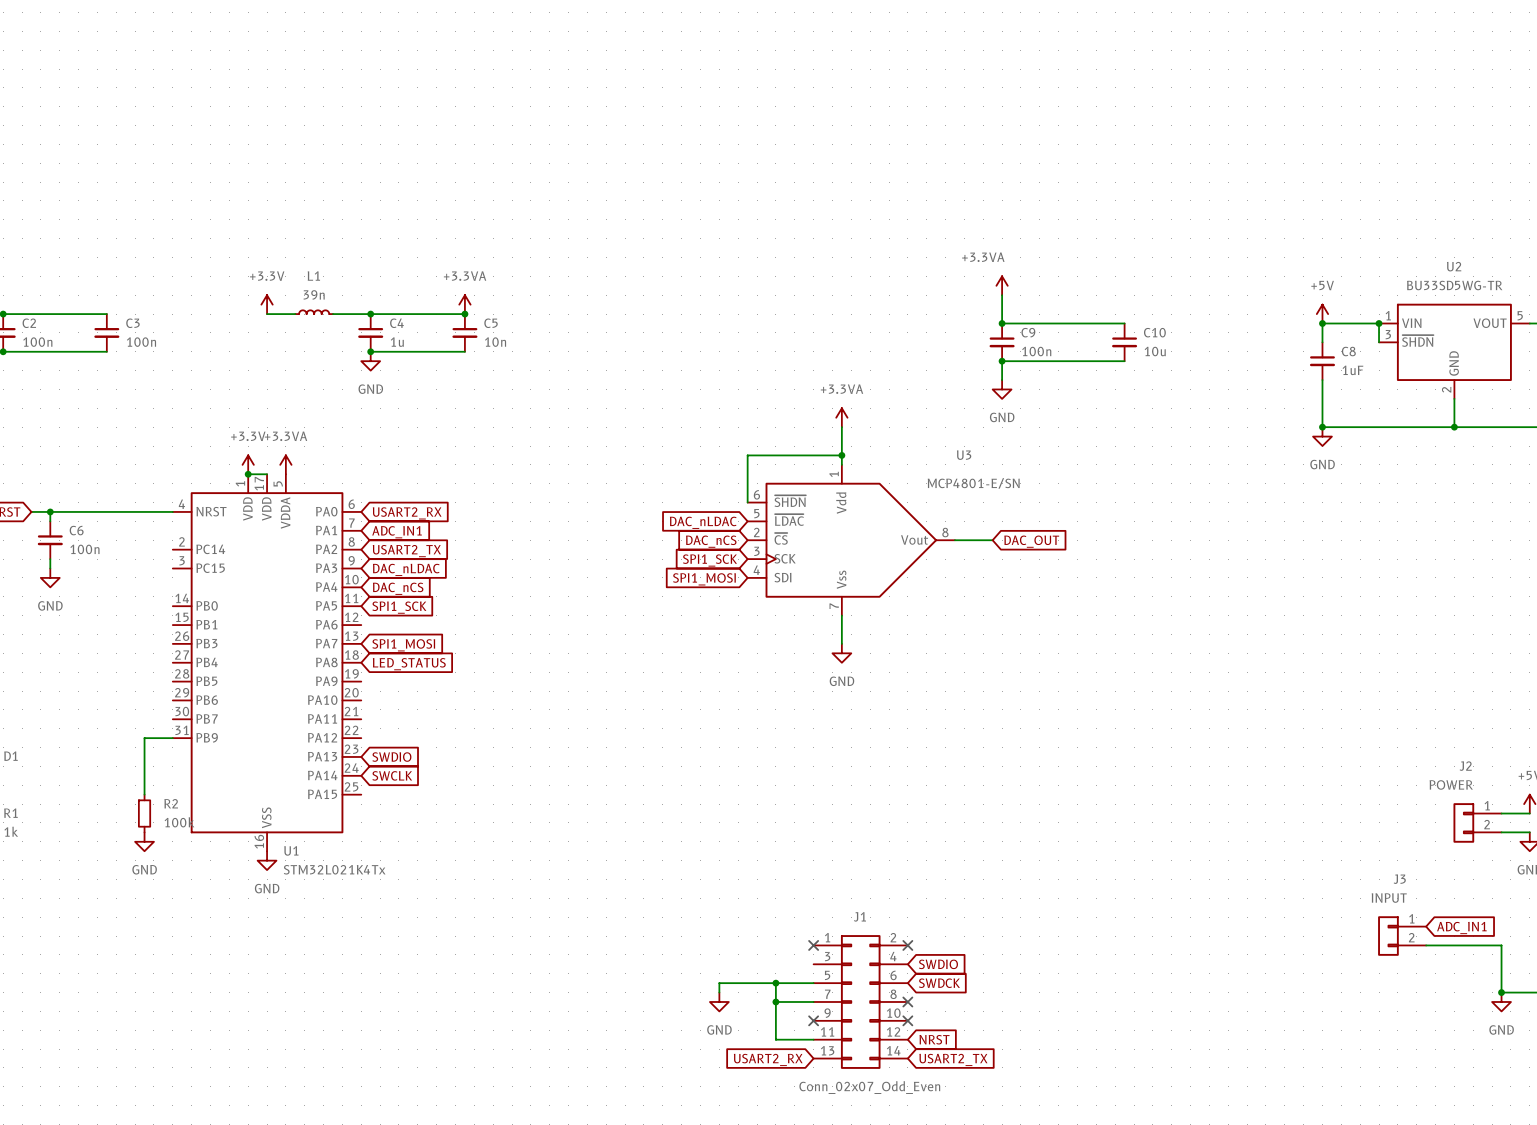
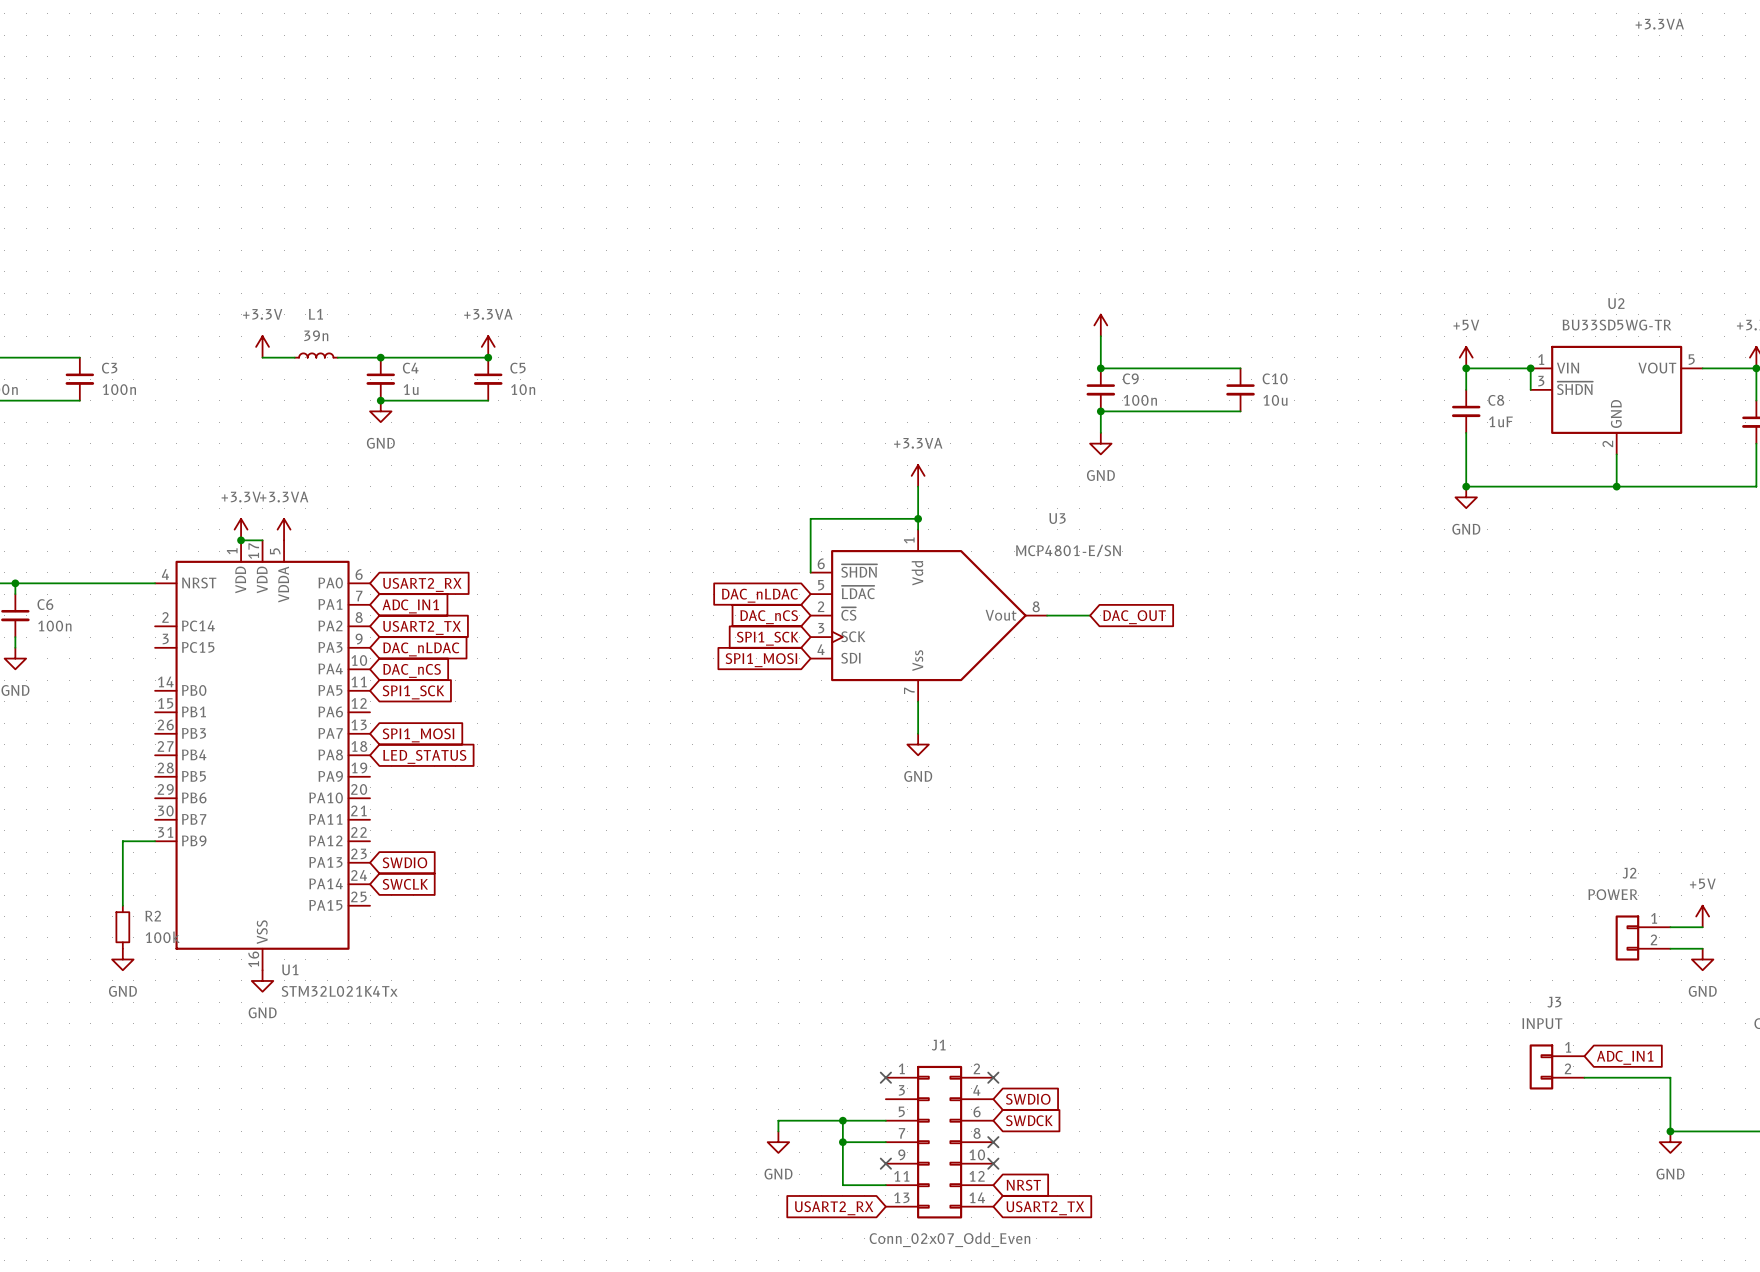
power symbol text position: +3.3VA (983, 257) -> +3.3VA (1659, 24)

